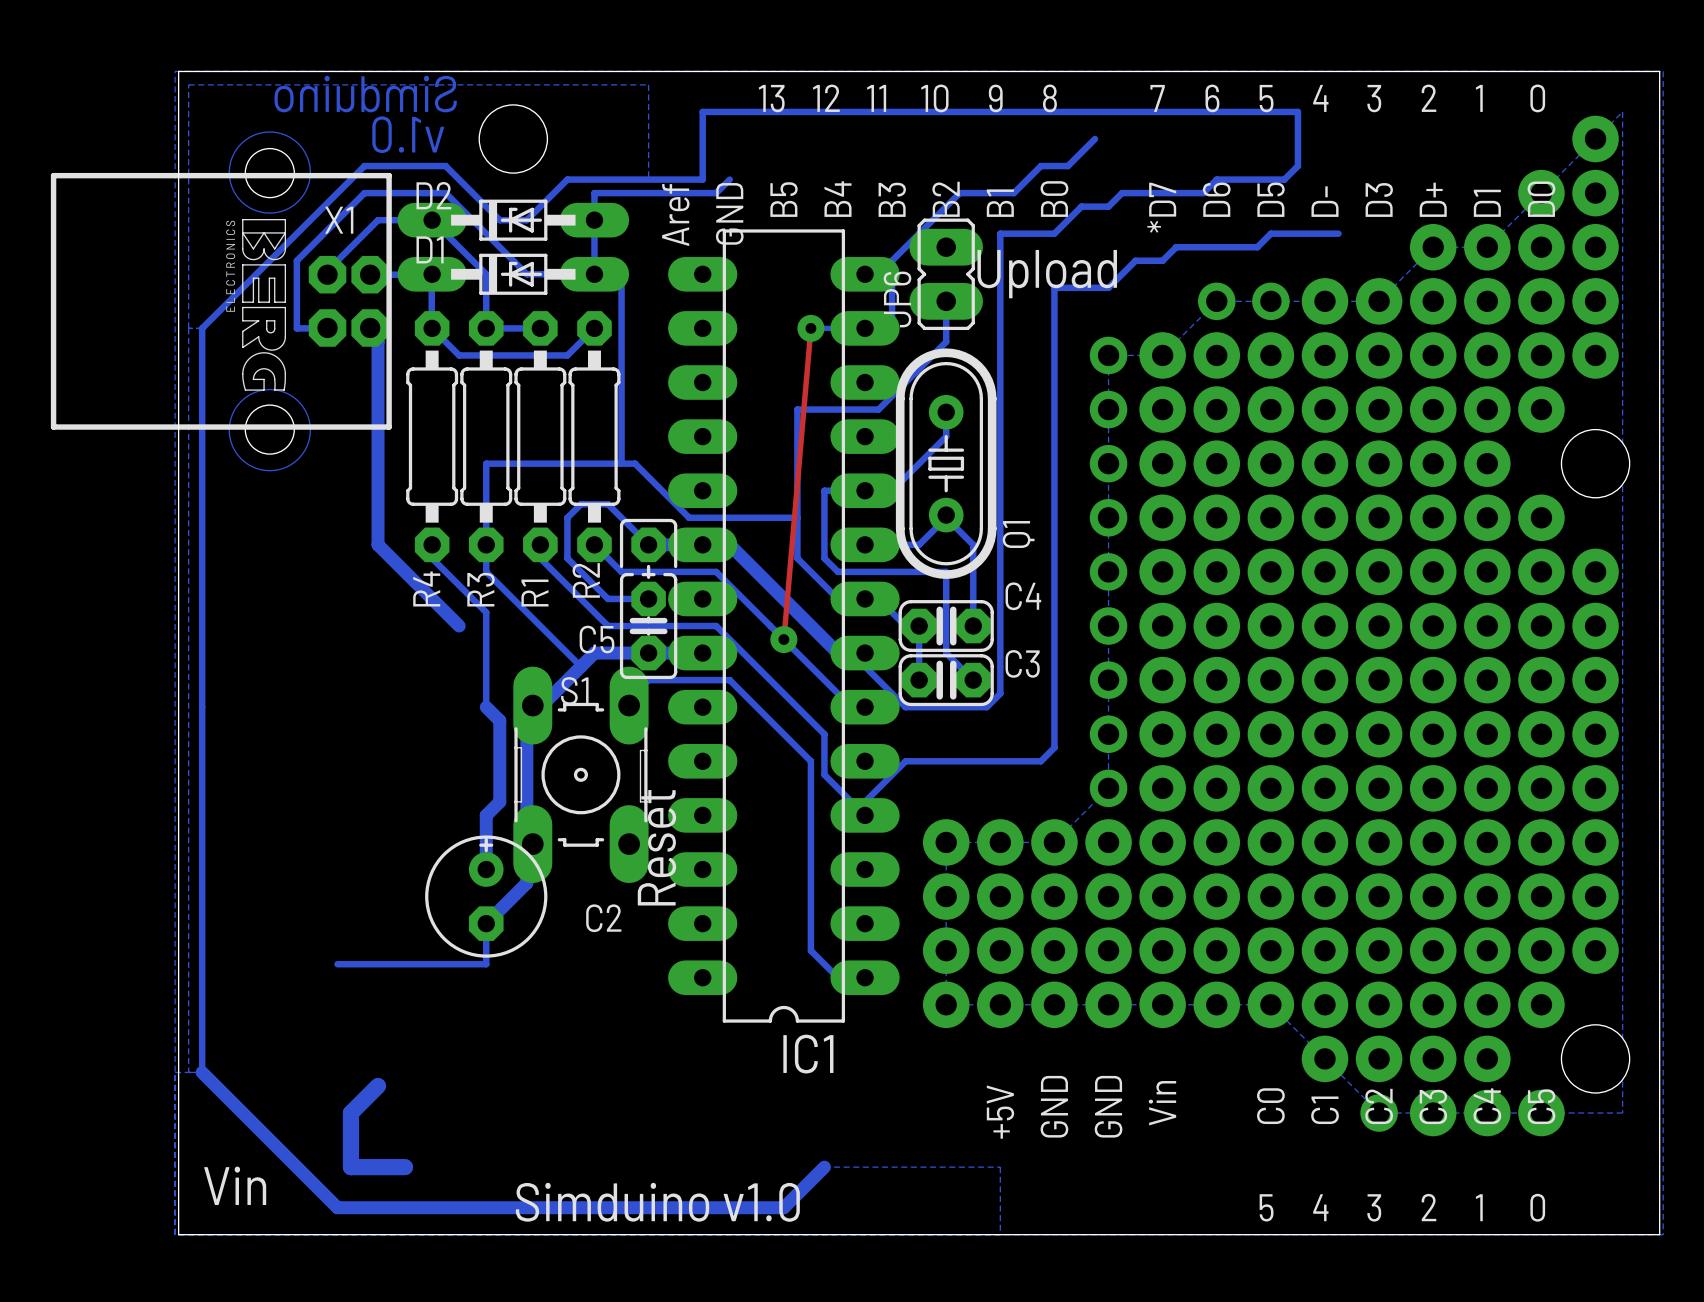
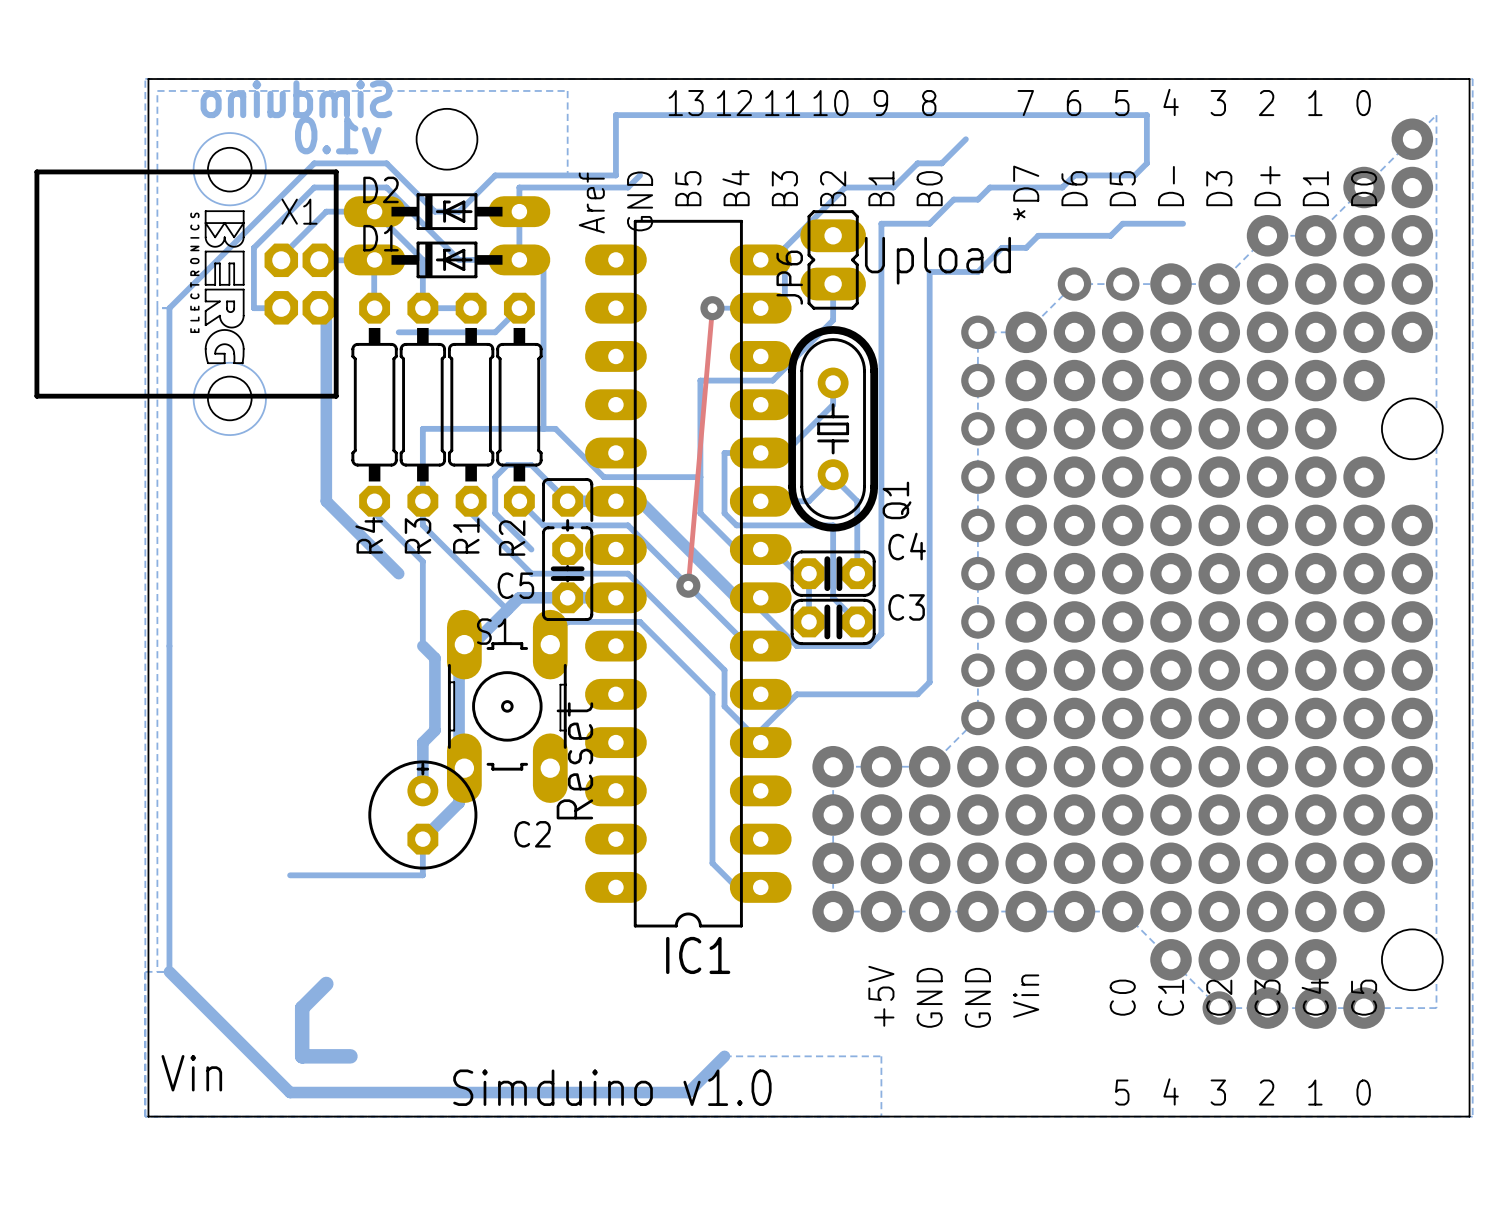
bottom track: (431, 327) (459, 355) -> none
bottom track: (608, 598) (648, 598) -> none

